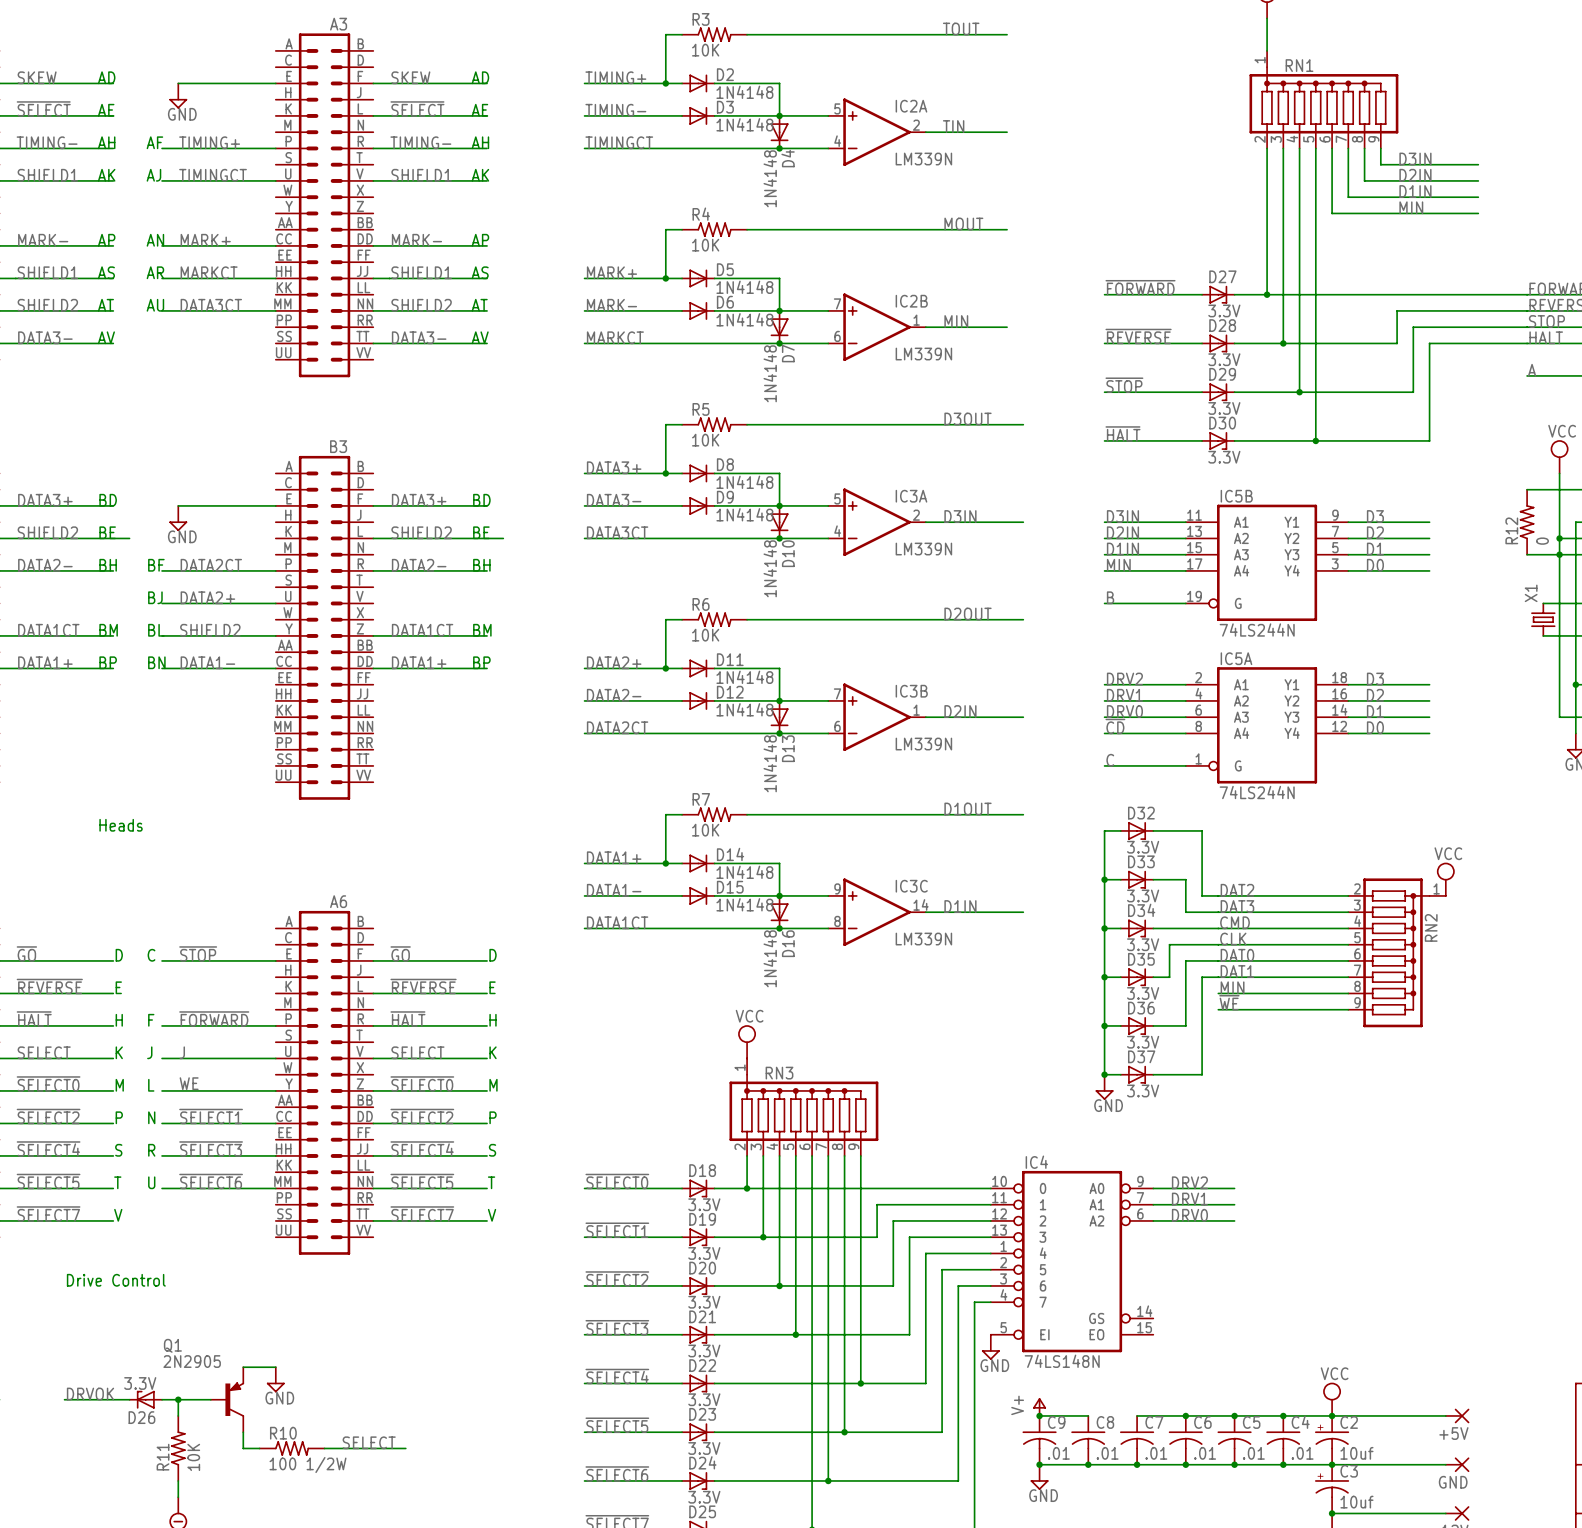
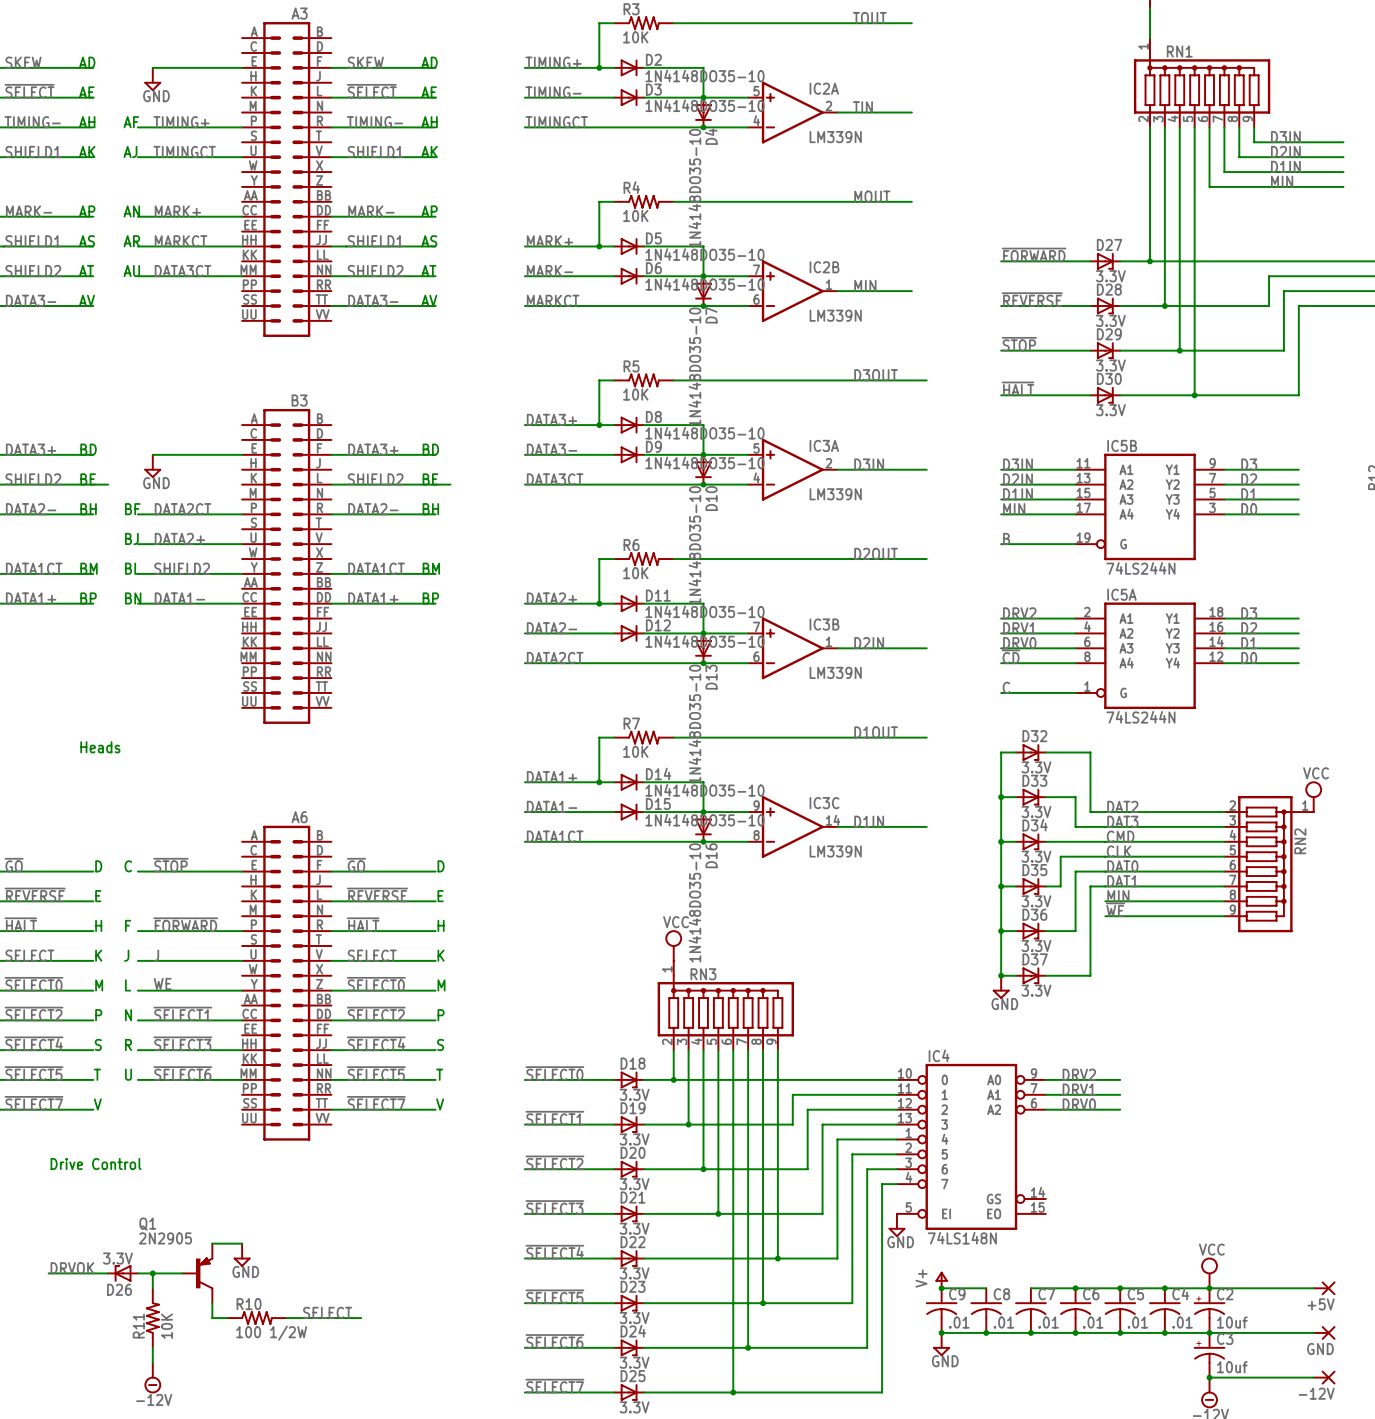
D2 value: 1N4148 (744, 92) -> 1N4148DO35-10 (705, 75)
D3 value: 1N4148 (744, 124) -> 1N4148DO35-10 (705, 105)
D4 value: 1N4148 (770, 178) -> 1N4148DO35-10 (694, 188)
D5 value: 1N4148 (744, 287) -> 1N4148DO35-10 (705, 254)
D6 value: 1N4148 (744, 319) -> 1N4148DO35-10 (705, 284)
D7 value: 1N4148 (770, 373) -> 1N4148DO35-10 (694, 367)
D8 value: 1N4148 (744, 482) -> 1N4148DO35-10 (705, 433)
D9 value: 1N4148 (744, 514) -> 1N4148DO35-10 (705, 462)
D10 value: 1N4148 (770, 568) -> 1N4148DO35-10 (694, 545)
D11 value: 1N4148 (744, 677) -> 1N4148DO35-10 (705, 611)
D12 value: 1N4148 (744, 709) -> 1N4148DO35-10 (705, 641)
D13 value: 1N4148 (770, 763) -> 1N4148DO35-10 (694, 724)
D14 value: 1N4148 (744, 872) -> 1N4148DO35-10 (705, 790)
D15 value: 1N4148 (744, 904) -> 1N4148DO35-10 (705, 820)
D16 value: 1N4148 (770, 958) -> 1N4148DO35-10 (694, 902)

